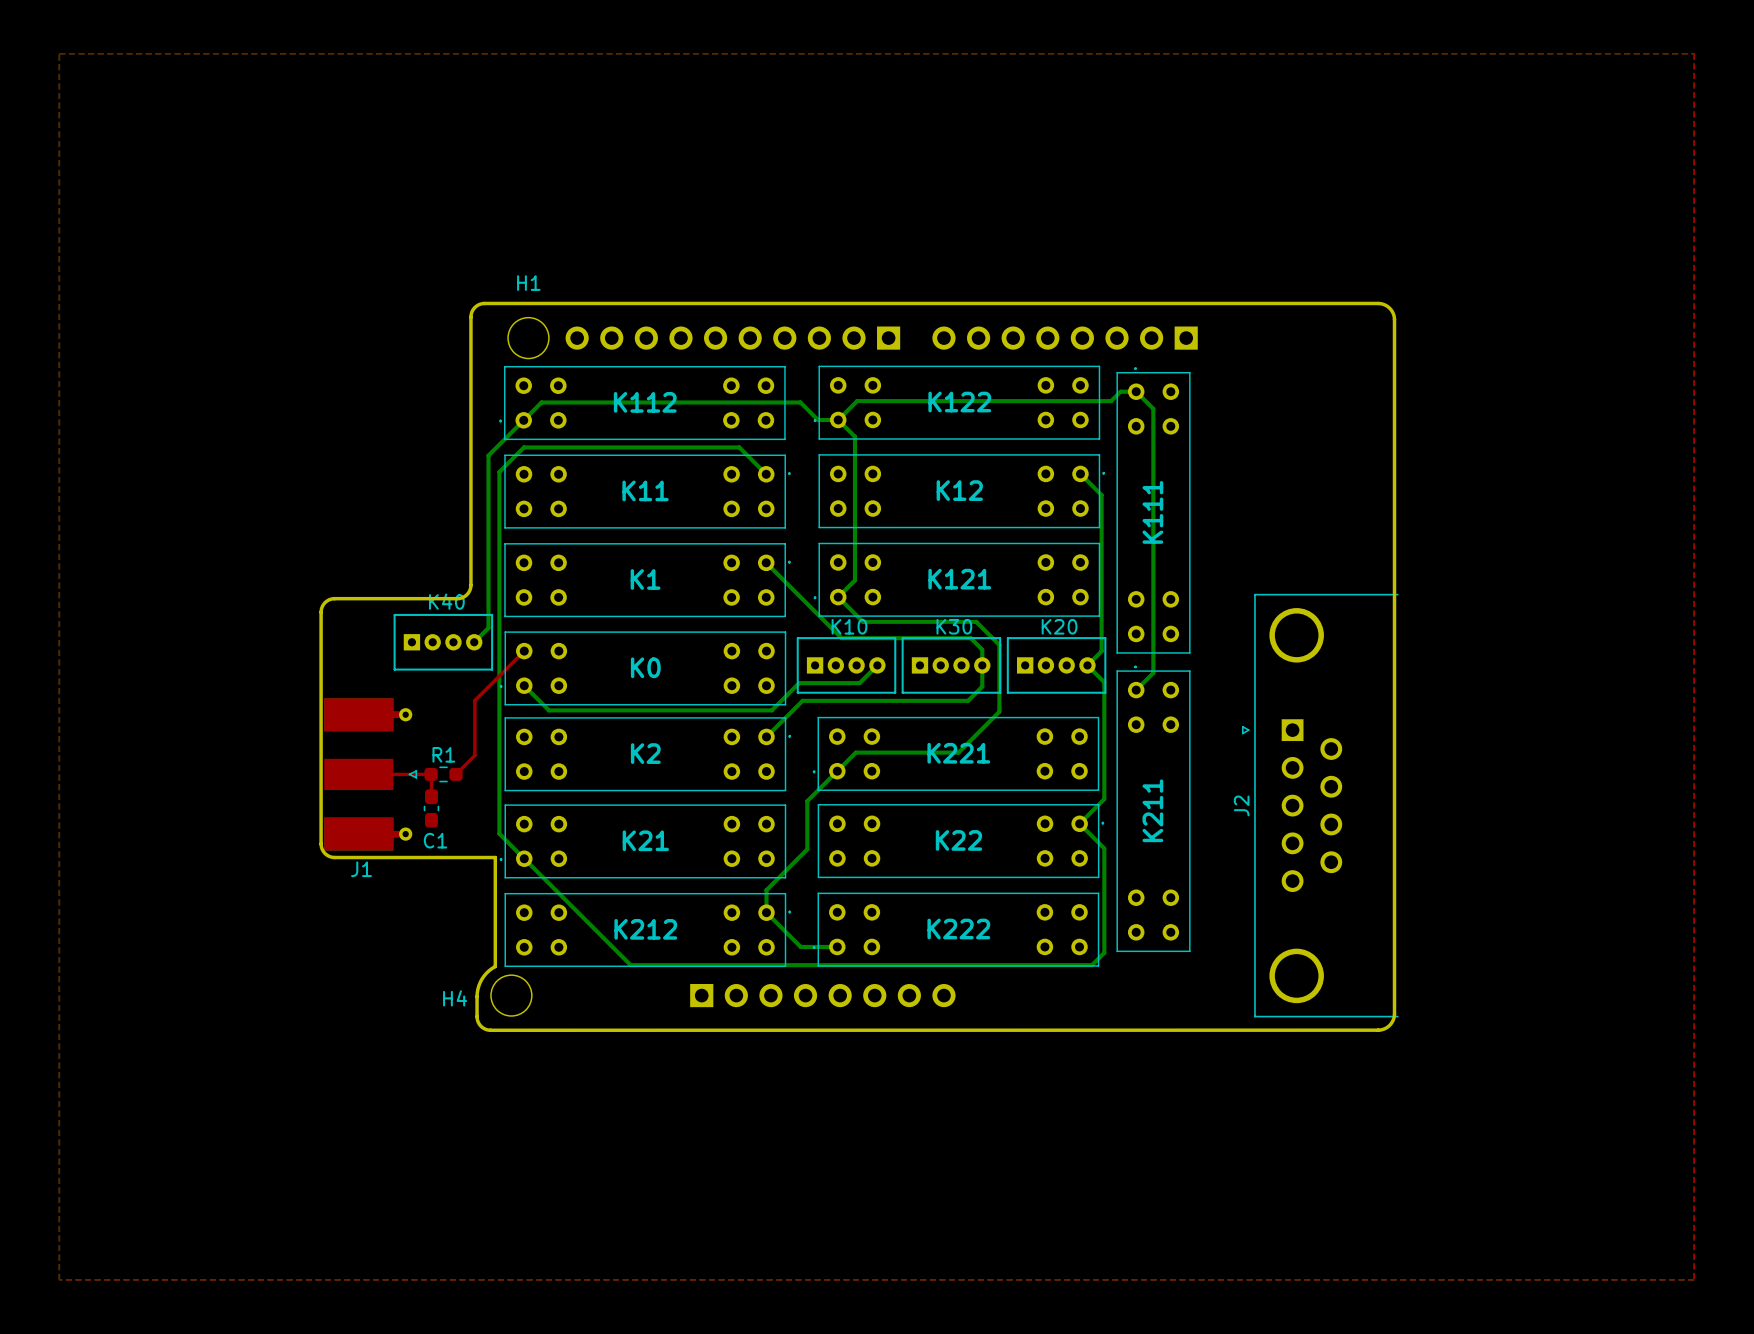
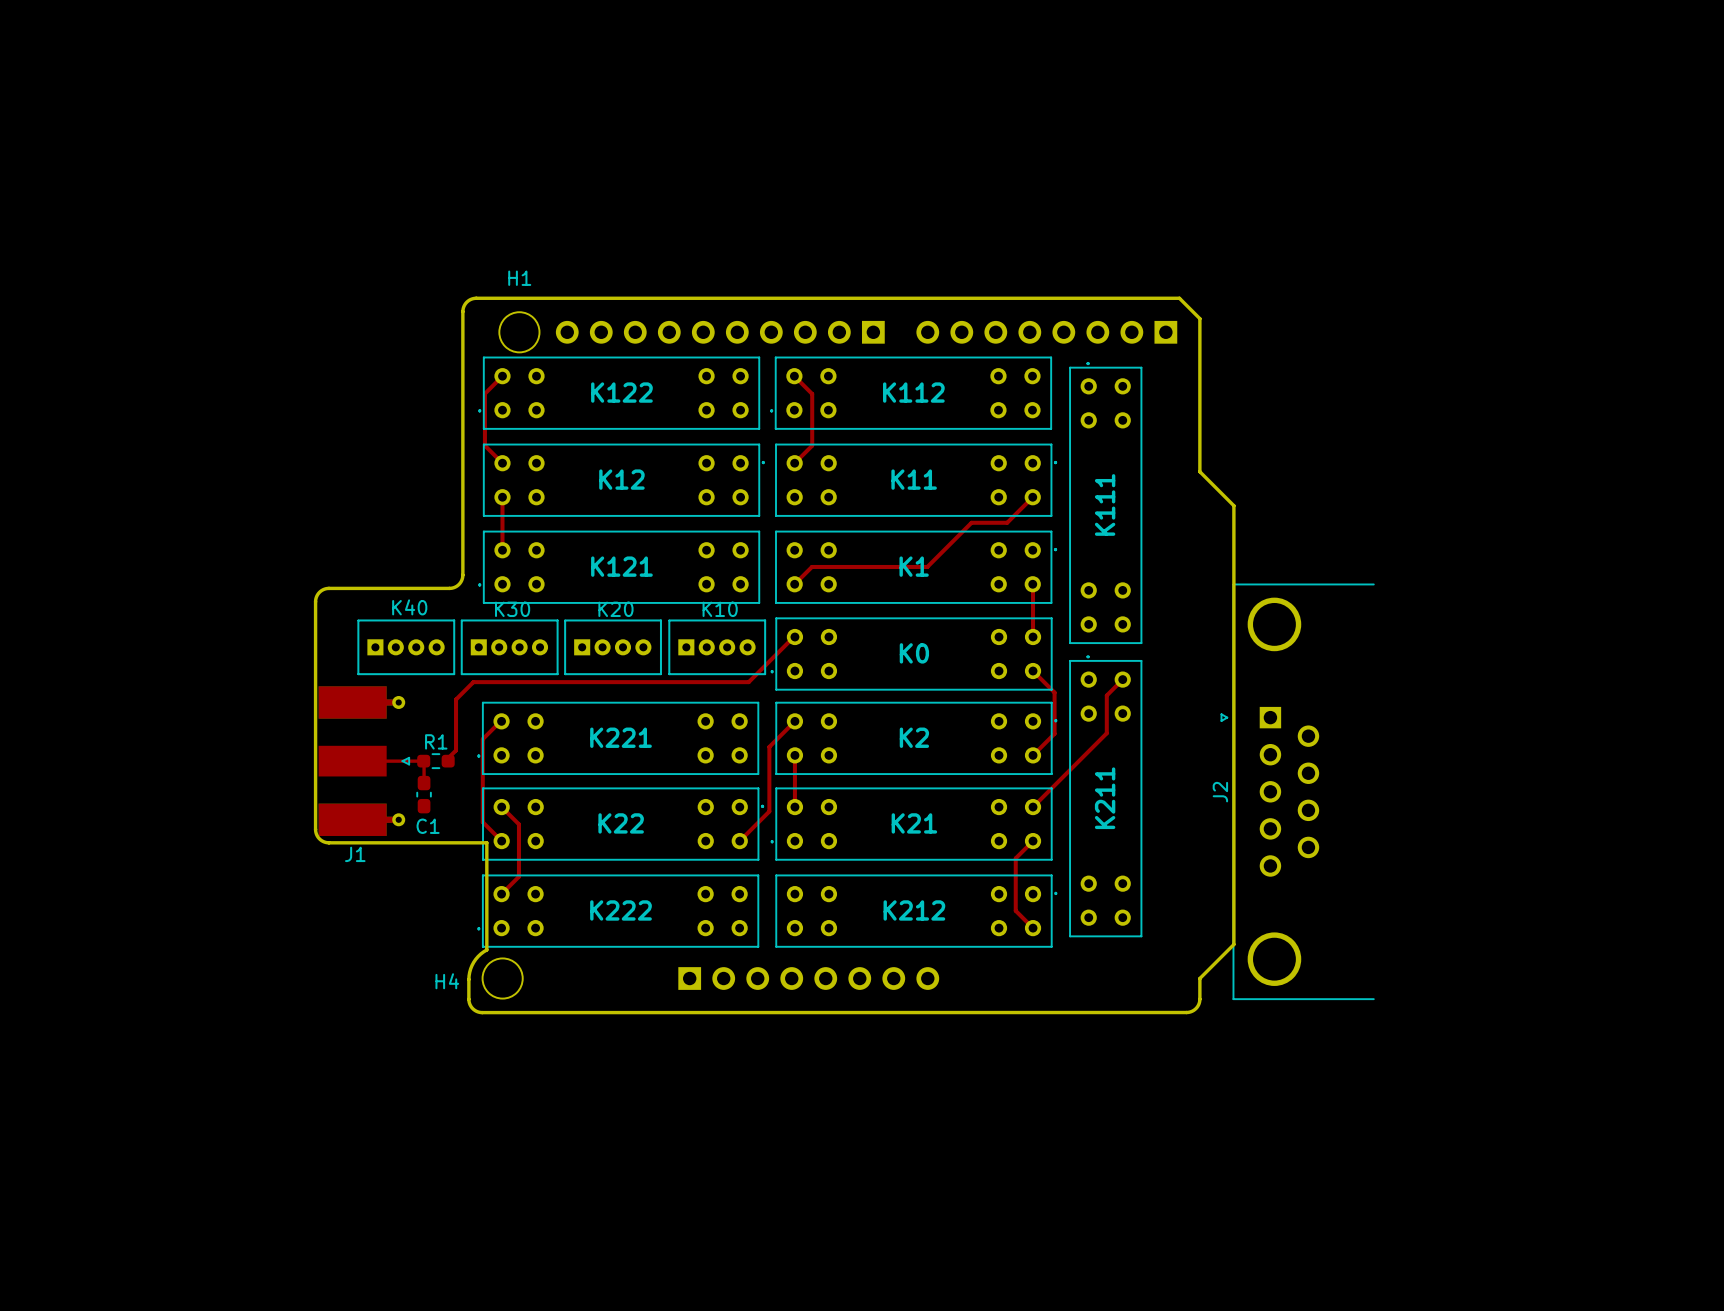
top zone outline: (59, 53) (59, 1279) (1694, 1279) (1694, 53) (59, 53) -> none
board edge: (1200, 303) (1380, 303) (1389, 308) (1394, 319) (1393, 1018) (1387, 1026) (1378, 1030) (1207, 1030) -> (1179, 298) (1199, 318) (1199, 471) (1233, 505) (1233, 944) (1199, 978) (1199, 1003) (1194, 1009) (1186, 1012)
top track: none -> (502, 376) (484, 393) (484, 445) (502, 463)
top track: none -> (794, 376) (812, 393) (812, 445) (794, 463)
K122 position: (956, 402) -> (619, 393)
K112 position: (642, 403) -> (911, 393)
bottom track: (838, 419) (857, 401) (1111, 401) (1120, 391) (1136, 391) (1153, 408) (1153, 672) (1136, 690) -> none
bottom track: (838, 419) (818, 419) (800, 402) (541, 402) (488, 455) (488, 627) (474, 642) -> none
bottom track: (838, 419) (854, 436) (854, 580) (838, 597) (862, 621) (976, 621) (999, 644) (999, 711) (958, 752) (855, 752) (807, 801) (807, 849) (766, 890) (766, 912) (800, 946) (837, 946) -> none
bottom track: (1080, 473) (1101, 495) (1101, 651) (1087, 665) (1104, 681) (1104, 799) (1079, 823) (1104, 848) (1104, 952) (1092, 965) (630, 965) (499, 833) (499, 471) (523, 447) (739, 447) (766, 474) -> none
K11 position: (647, 491) -> (916, 480)
K12 position: (961, 491) -> (623, 480)
top track: none -> (502, 497) (502, 550)
top track: none -> (1032, 497) (1007, 522) (971, 522) (927, 566) (811, 566) (794, 584)
K111 position: (1153, 510) -> (1105, 503)
bottom track: (766, 562) (841, 638) (970, 638) (982, 649) (982, 686) (968, 700) (802, 700) (766, 736) -> none
K121 position: (956, 579) -> (619, 567)
K1 position: (647, 580) -> (916, 567)
top track: none -> (1032, 584) (1033, 637)
K40 position: (443, 642) -> (406, 647)
top track: none -> (796, 634) (748, 682) (473, 682) (456, 699) (456, 750) (445, 760)
top track: (524, 651) (474, 700) (474, 755) (455, 774) -> none
K10 position: (846, 665) -> (717, 647)
bottom track: (877, 665) (859, 683) (799, 683) (771, 710) (548, 710) (524, 685) -> none
K30 position: (951, 665) -> (509, 647)
K20 position: (1056, 665) -> (613, 647)
K0 position: (642, 668) -> (911, 654)
top track: none -> (1033, 671) (1054, 692) (1054, 733) (1033, 755)
top track: none -> (1122, 679) (1106, 695) (1106, 733) (1033, 807)
top track: none -> (501, 720) (482, 739) (482, 822) (501, 841)
top track: none -> (794, 721) (769, 746) (769, 811) (739, 841)
K221 position: (955, 753) -> (618, 738)
K2 position: (647, 754) -> (916, 738)
top track: none -> (794, 755) (794, 807)
K211 position: (1153, 808) -> (1105, 796)
top track: none -> (501, 807) (518, 824) (518, 876) (501, 894)
K21 position: (642, 841) -> (911, 824)
K22 position: (960, 841) -> (623, 824)
top track: none -> (1033, 841) (1015, 858) (1015, 910) (1033, 928)
K212 position: (647, 929) -> (916, 911)
K222 position: (955, 929) -> (618, 911)

